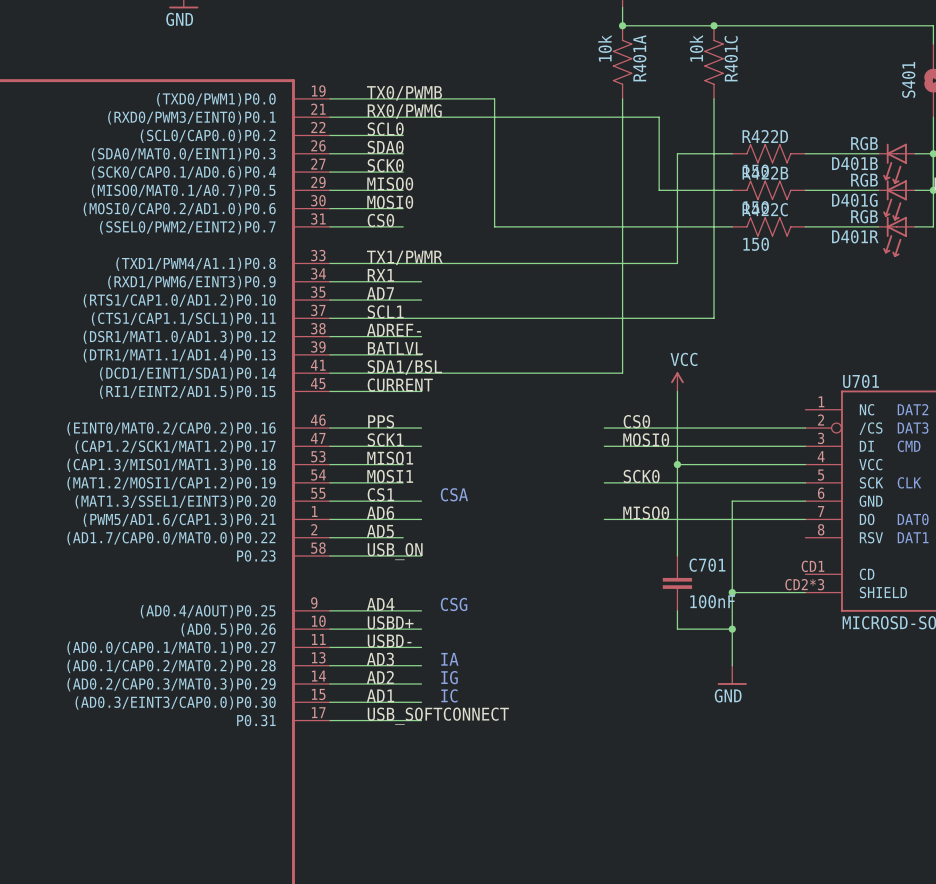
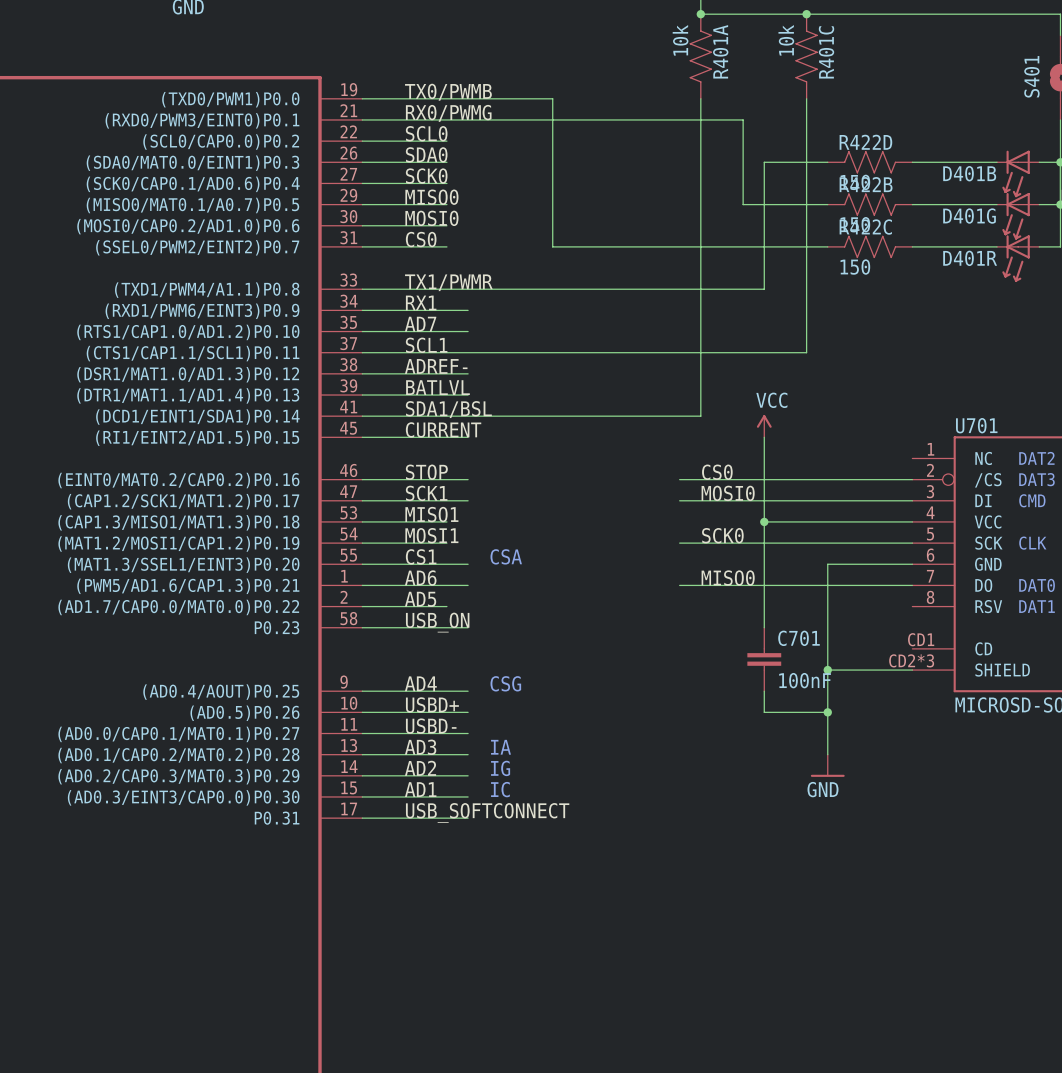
D401B value: RGB (864, 143) -> none
D401G value: RGB (864, 180) -> none
D401R value: RGB (864, 216) -> none
label: PPS (381, 421) -> STOP (426, 472)

